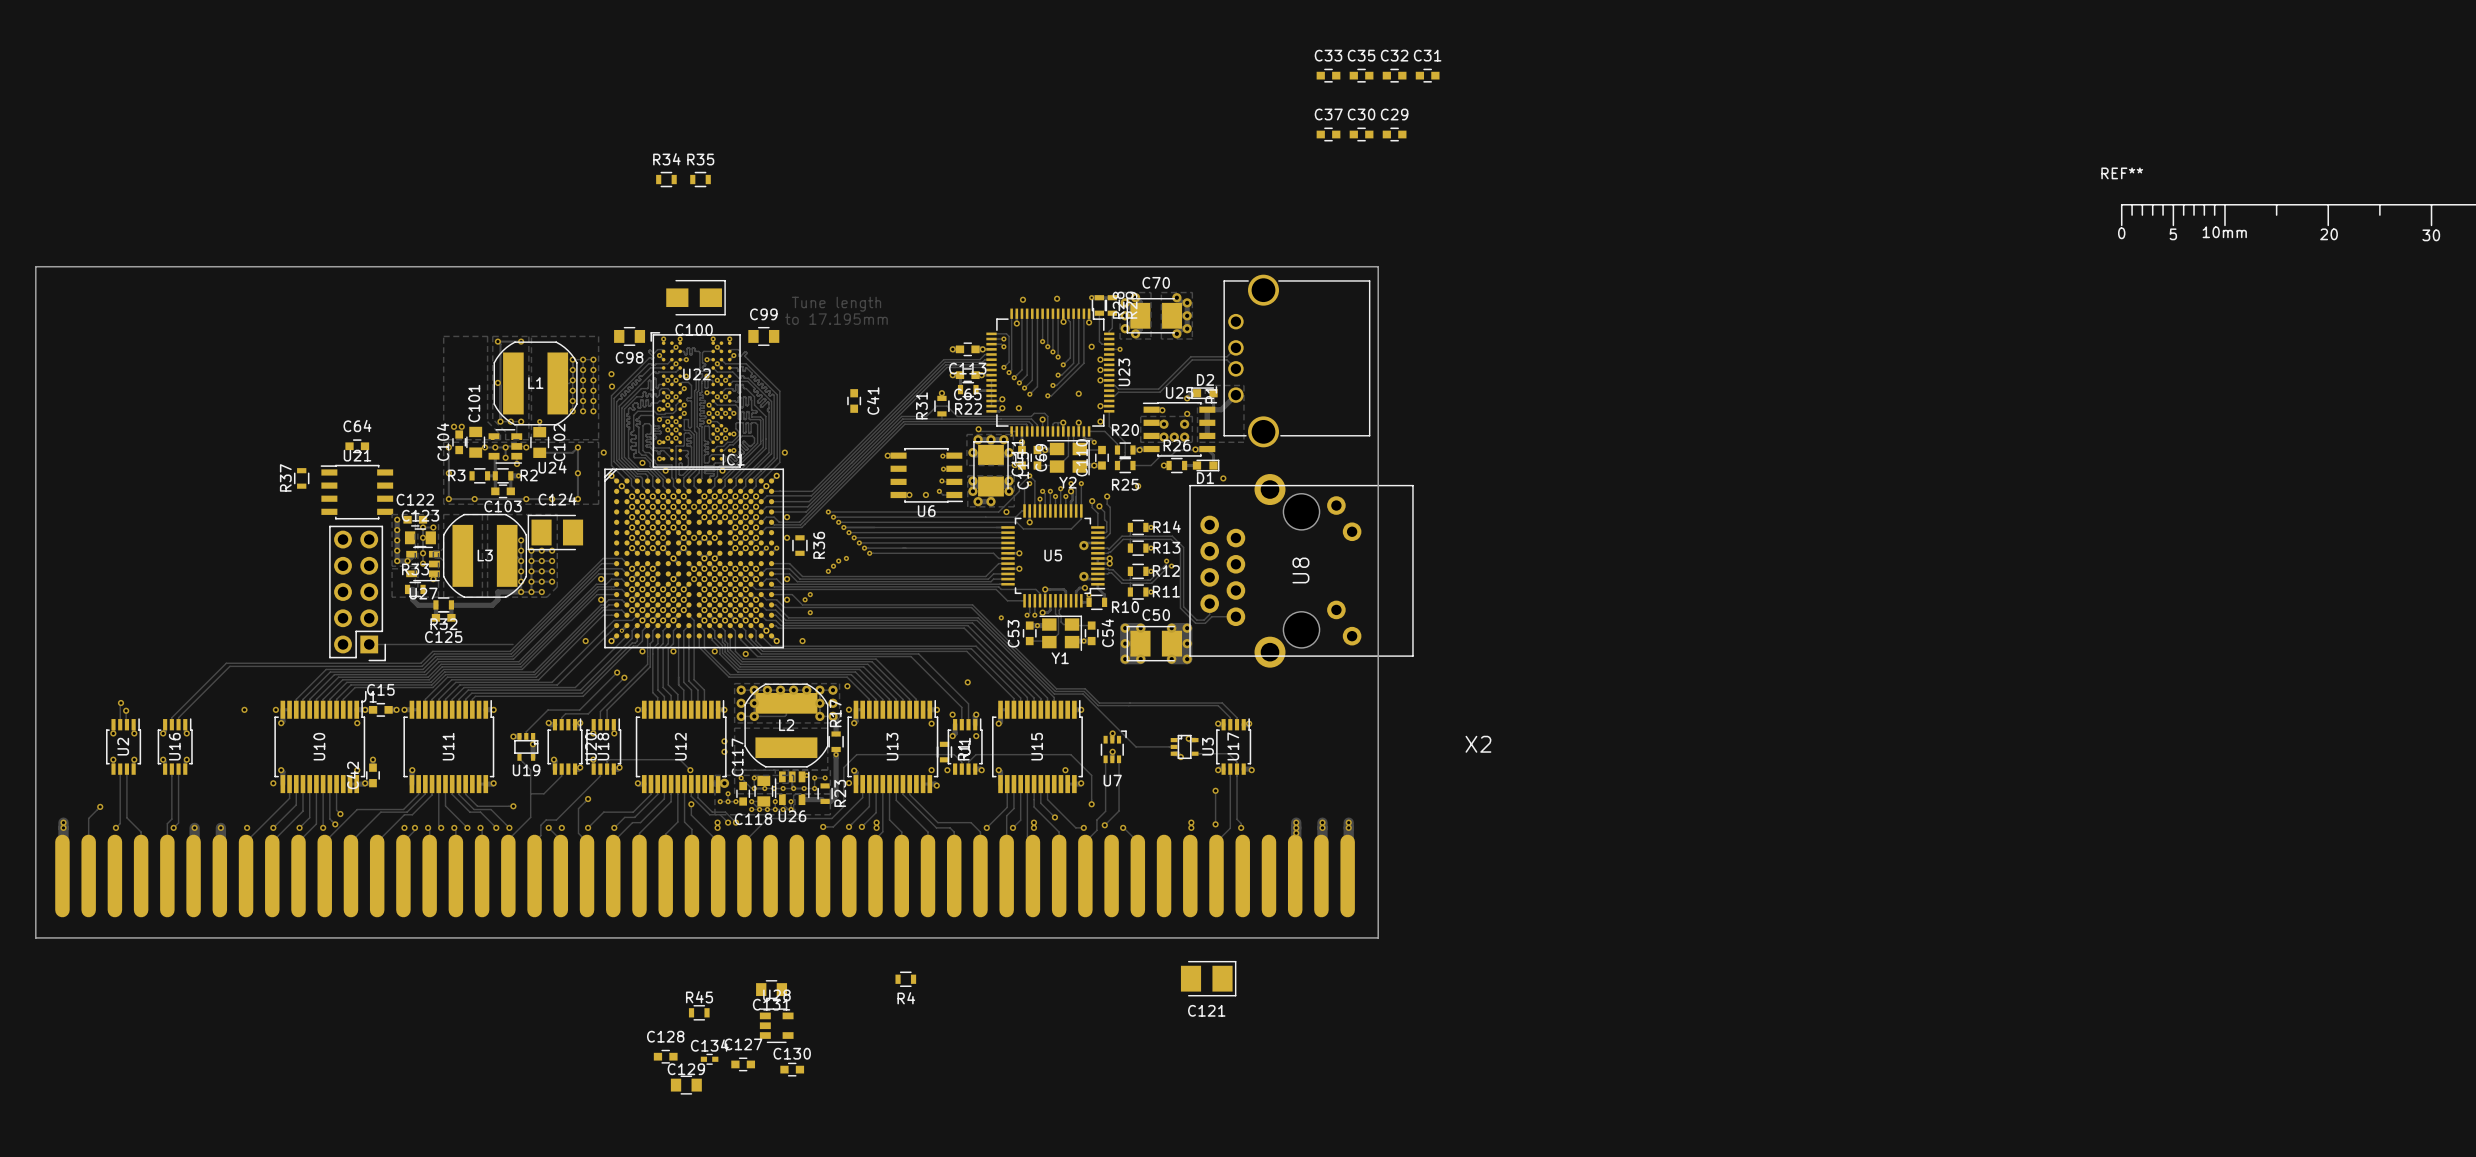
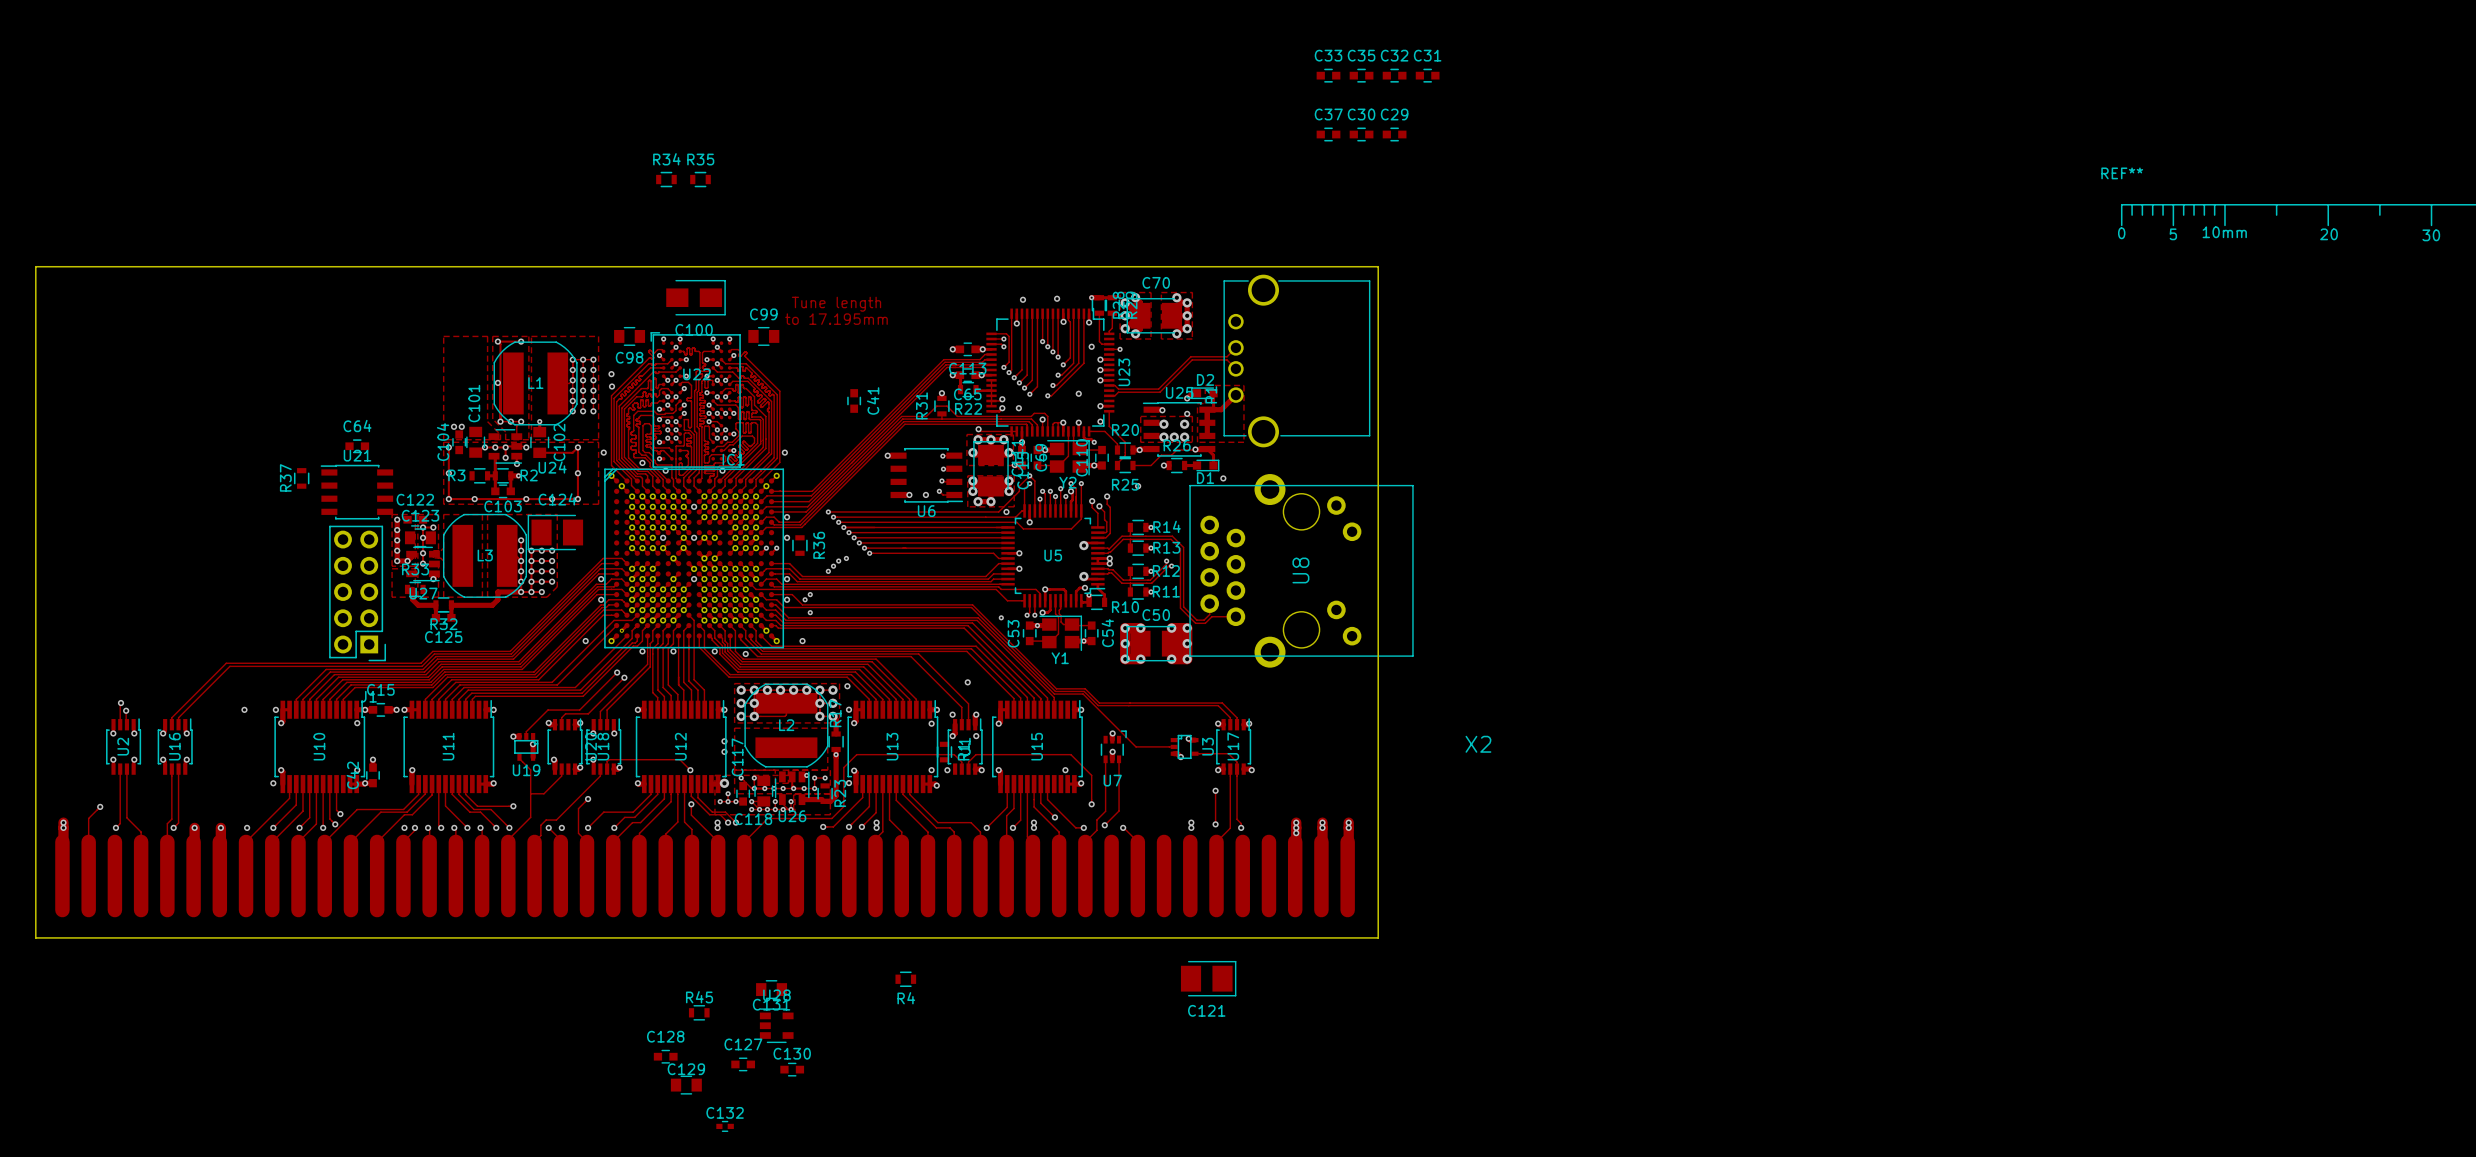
track: (369, 644) (513, 644) -> none
C134: (709, 1059) -> none
C132: none -> (725, 1126)

